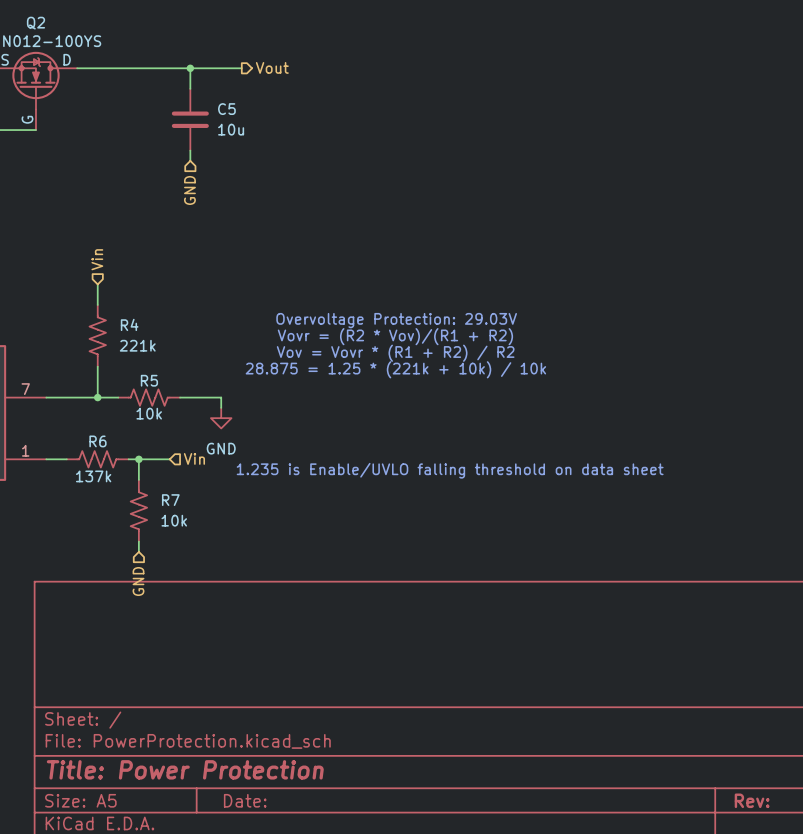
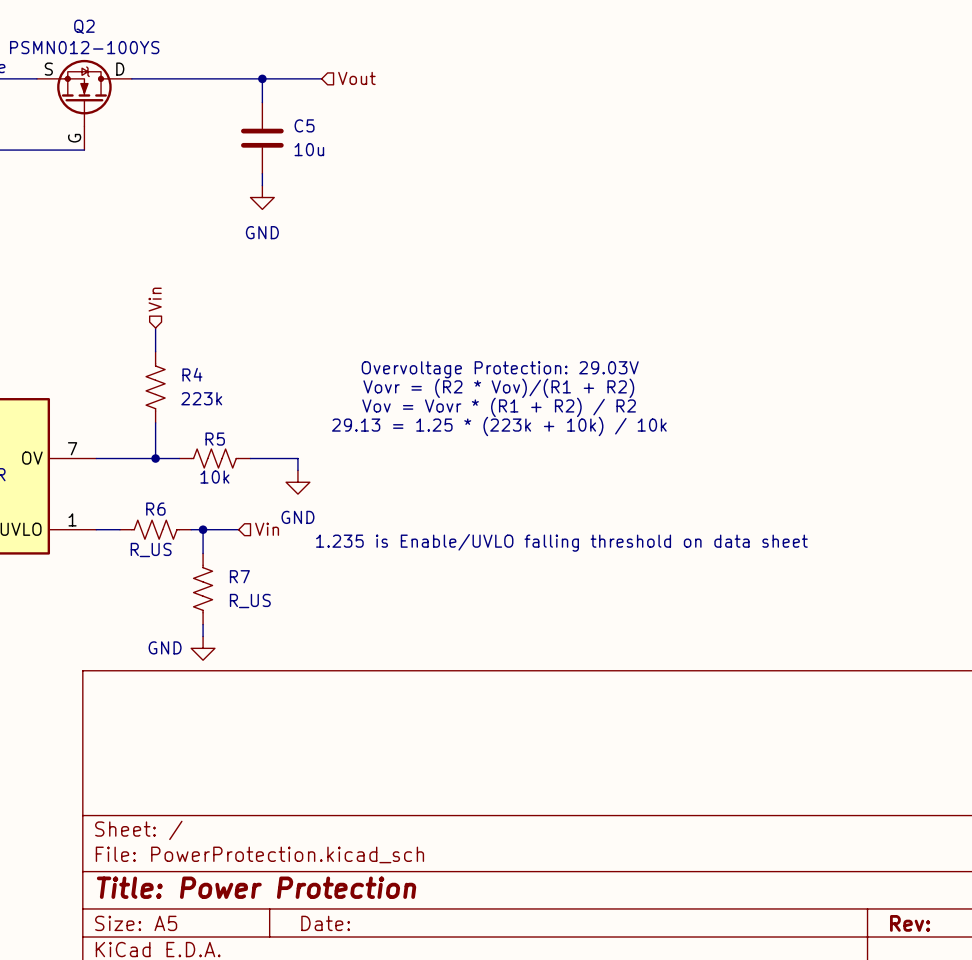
hierarchical label shape: output (272, 67) -> input (356, 78)
power symbol: none -> GND (262, 197)
hierarchical label: GND (189, 190) -> none
R4 value: 221k (137, 345) -> 223k (201, 398)
text: 28.875 = 1.25 * (221k + 10k) / 10k (395, 369) -> 29.13 = 1.25 * (223k + 10k) / 10k (499, 426)
R6 value: 137k (93, 476) -> R_US (151, 549)
R7 value: 10k (174, 520) -> R_US (250, 601)
power symbol: none -> GND (203, 648)
hierarchical label: GND (138, 581) -> none

